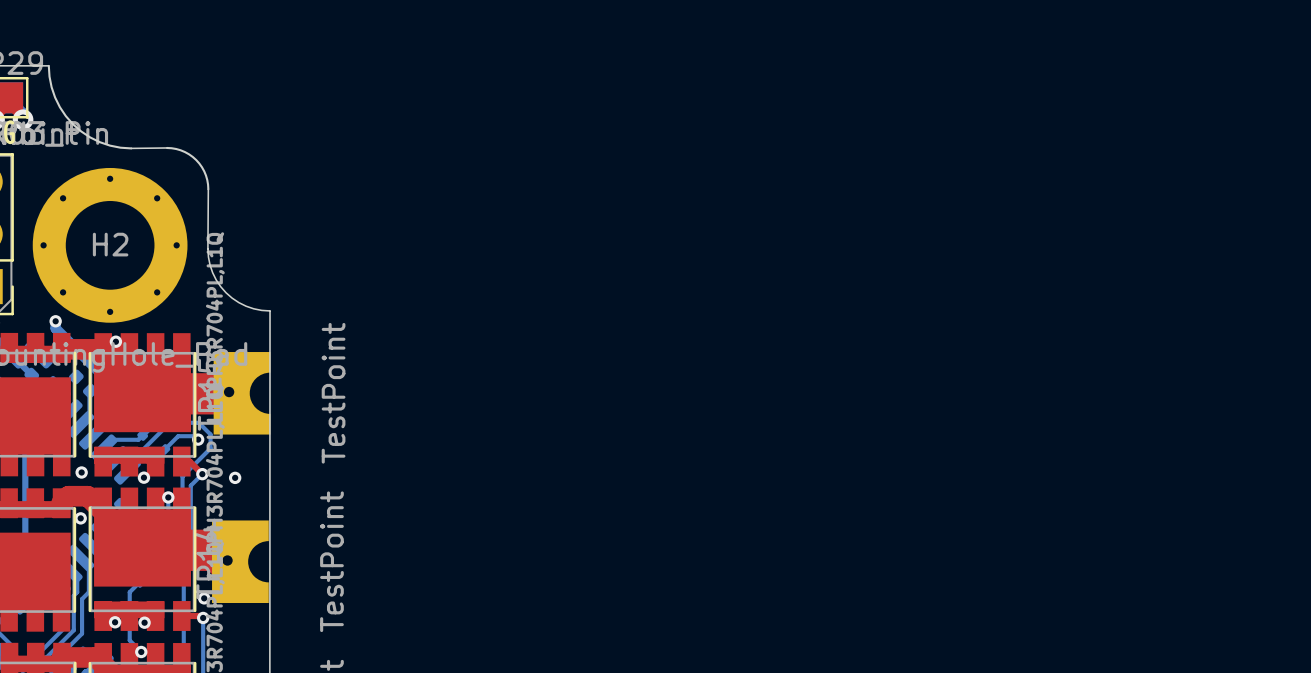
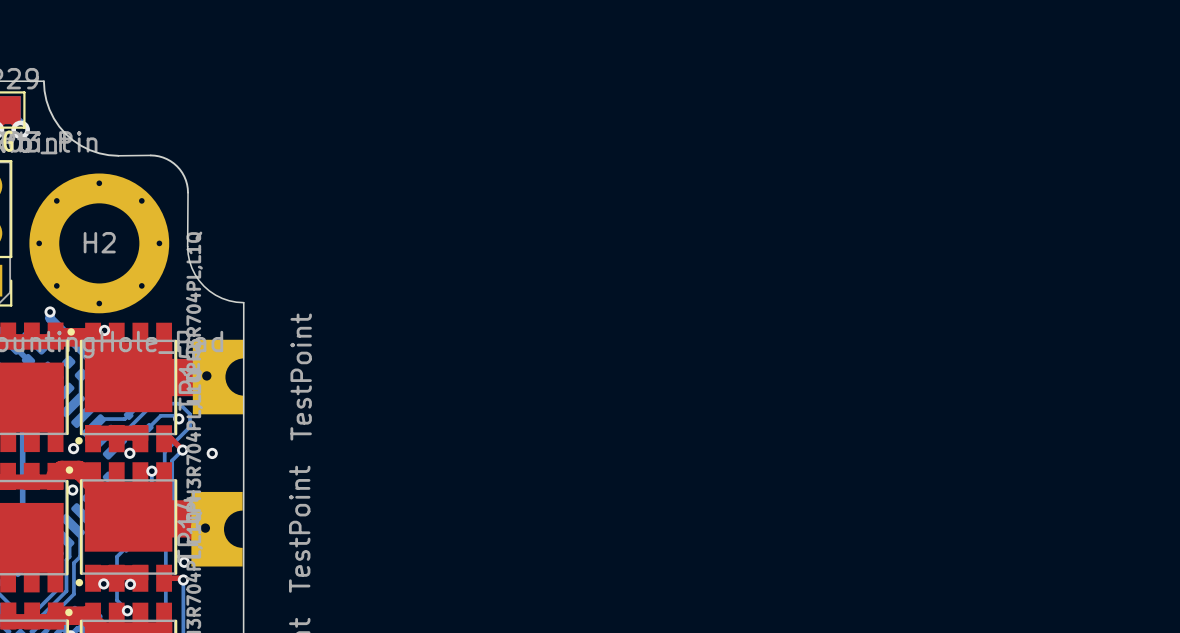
drawing: none -> [67, 328, 75, 336]
drawing: none -> [65, 437, 83, 474]
drawing: none -> [75, 578, 84, 587]
drawing: none -> [65, 608, 73, 617]

